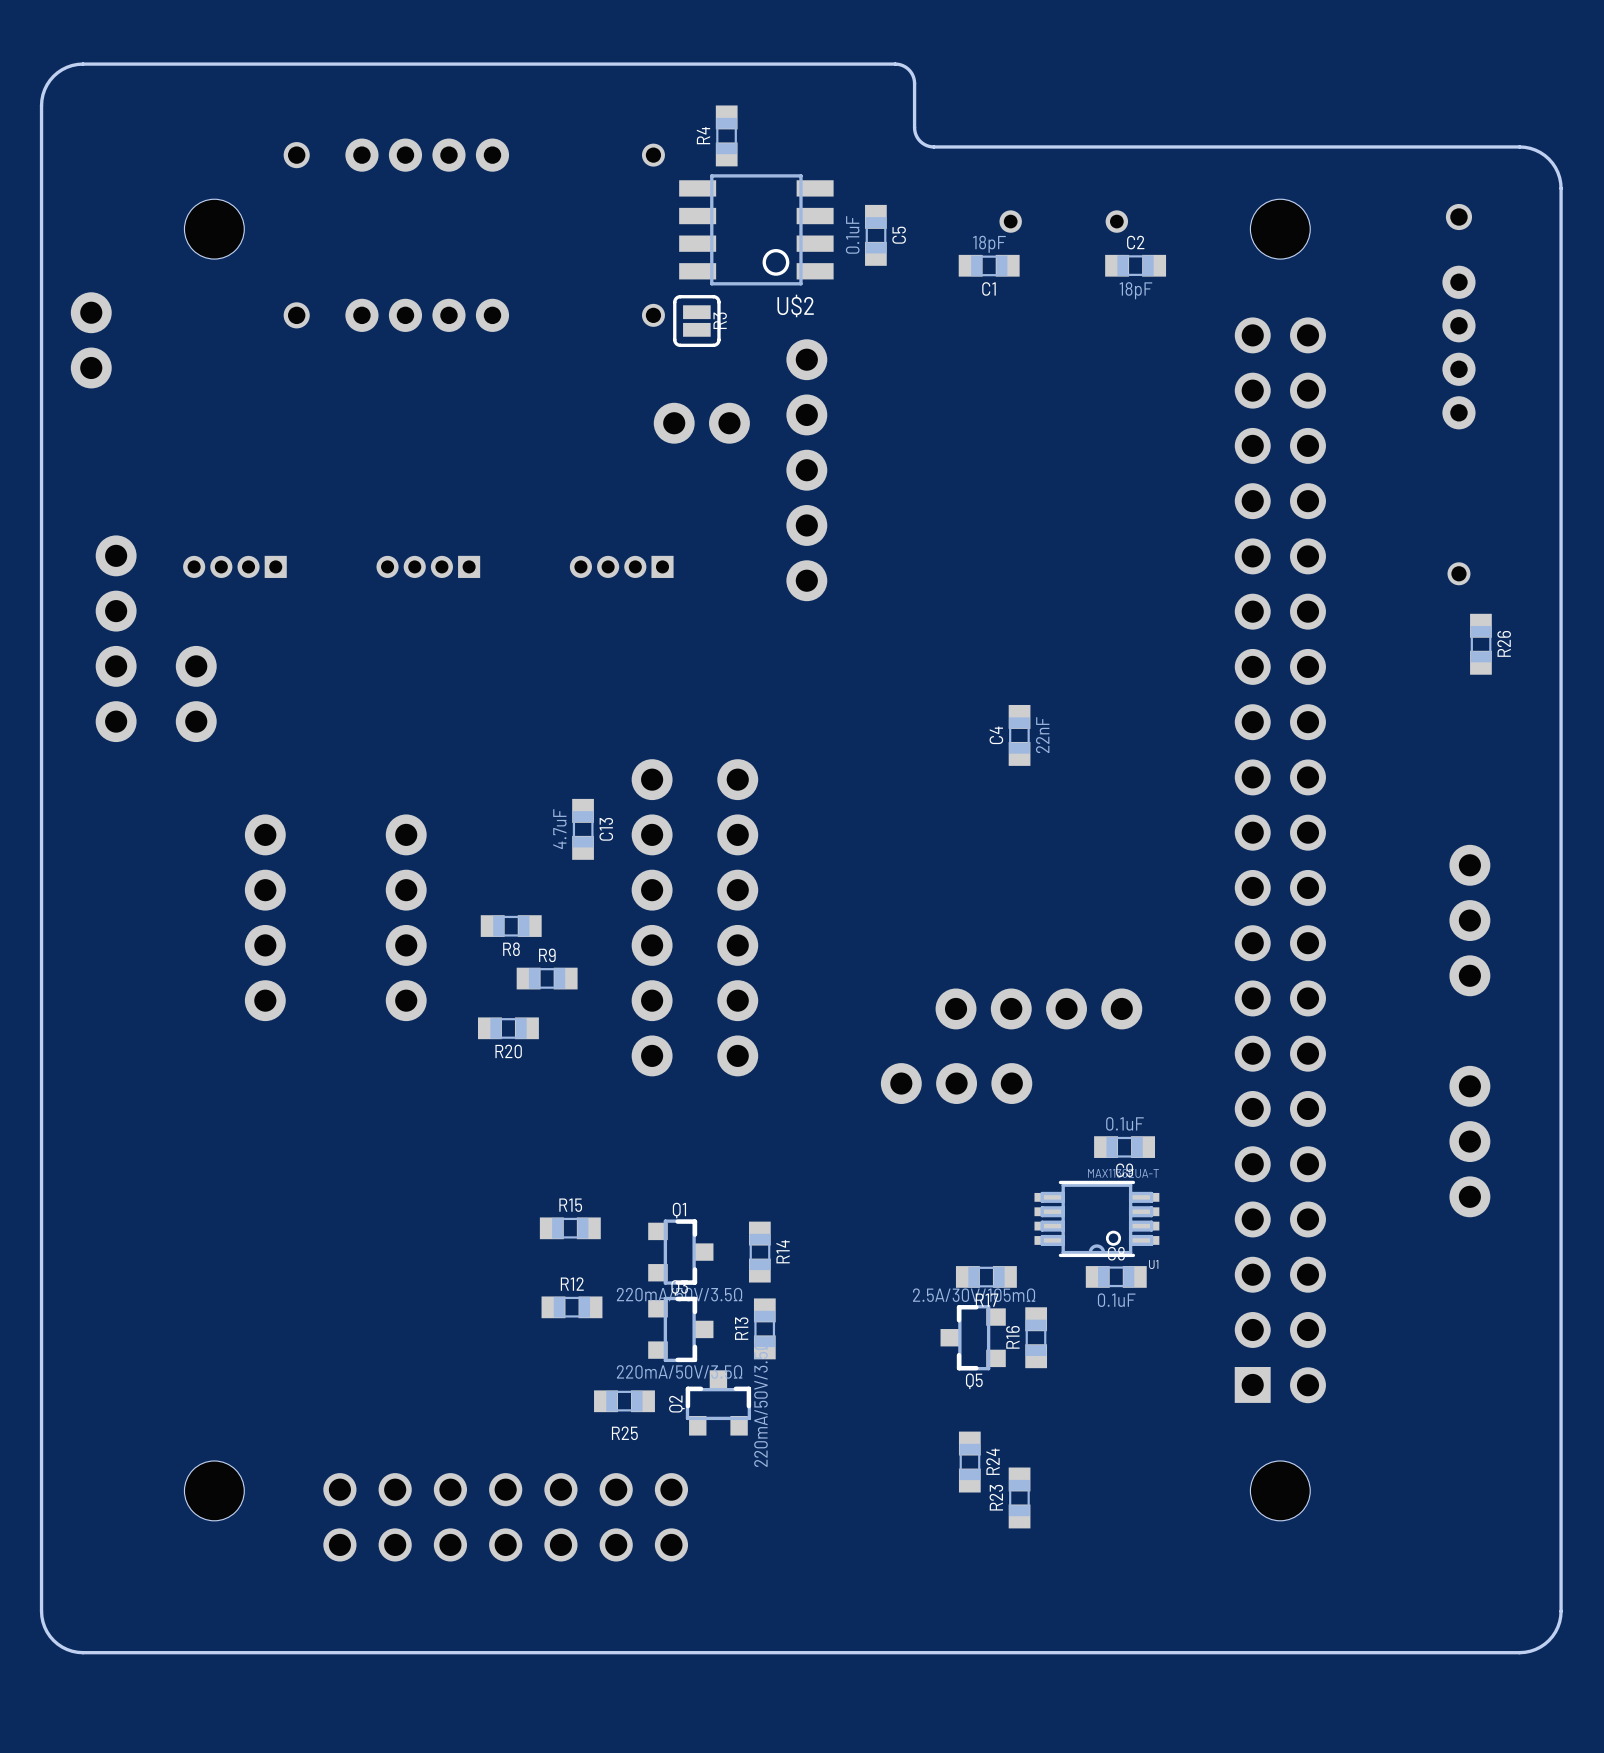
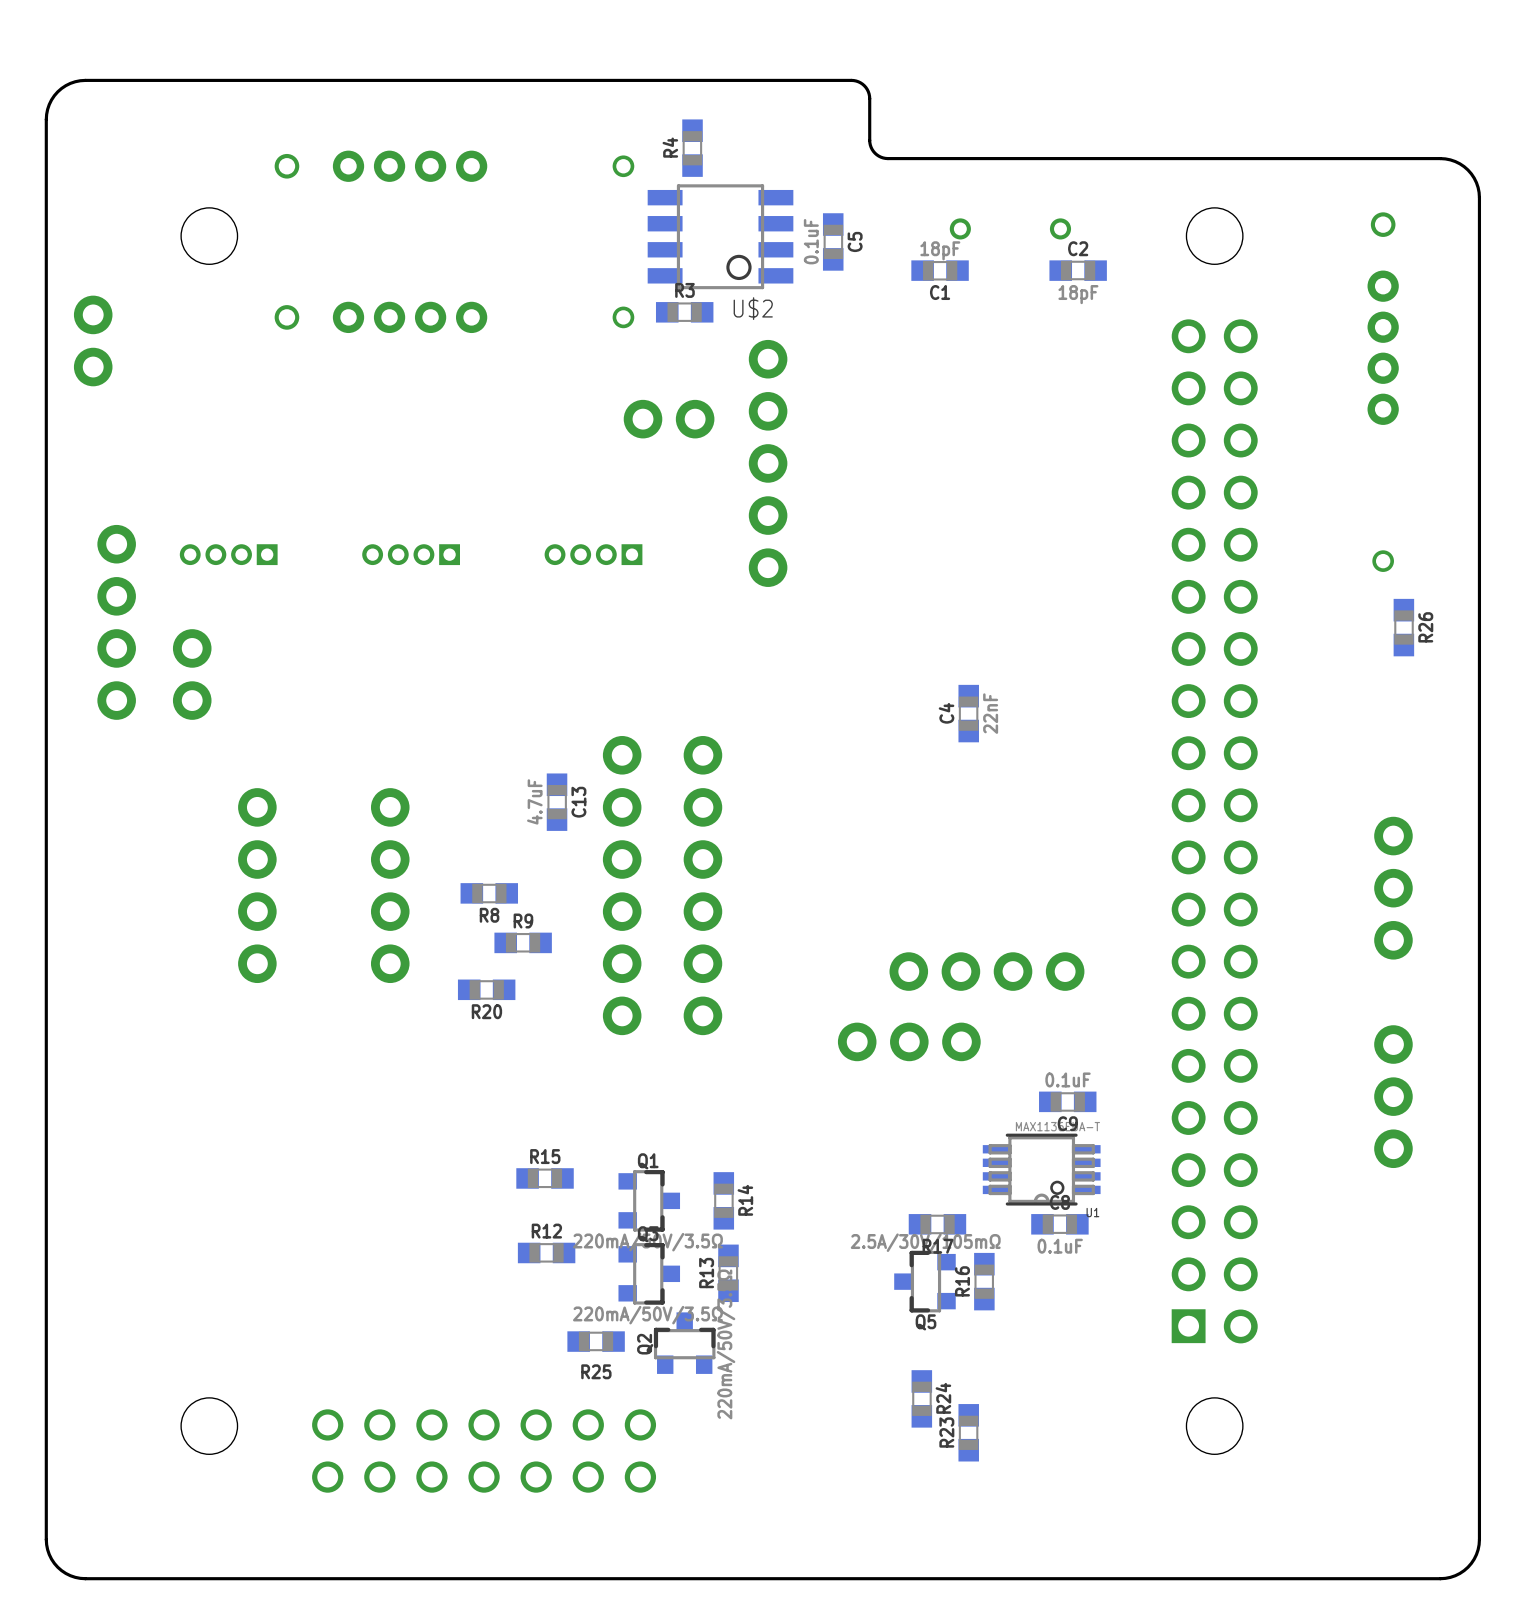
R3 footprint: [673, 295, 721, 347] -> [655, 302, 714, 323]

